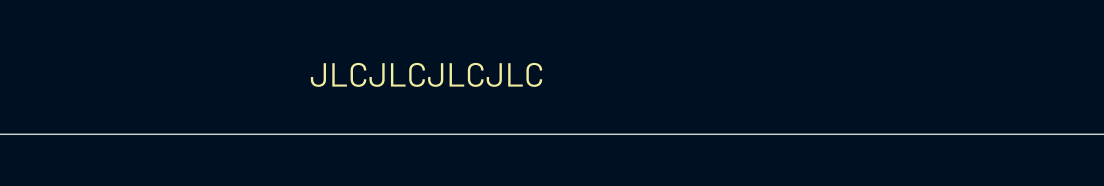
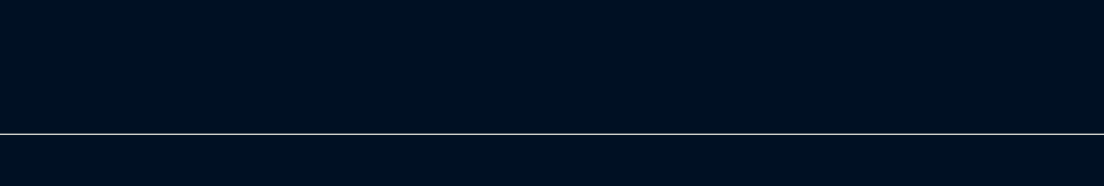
text: JLCJLCJLCJLC (426, 74) -> none

